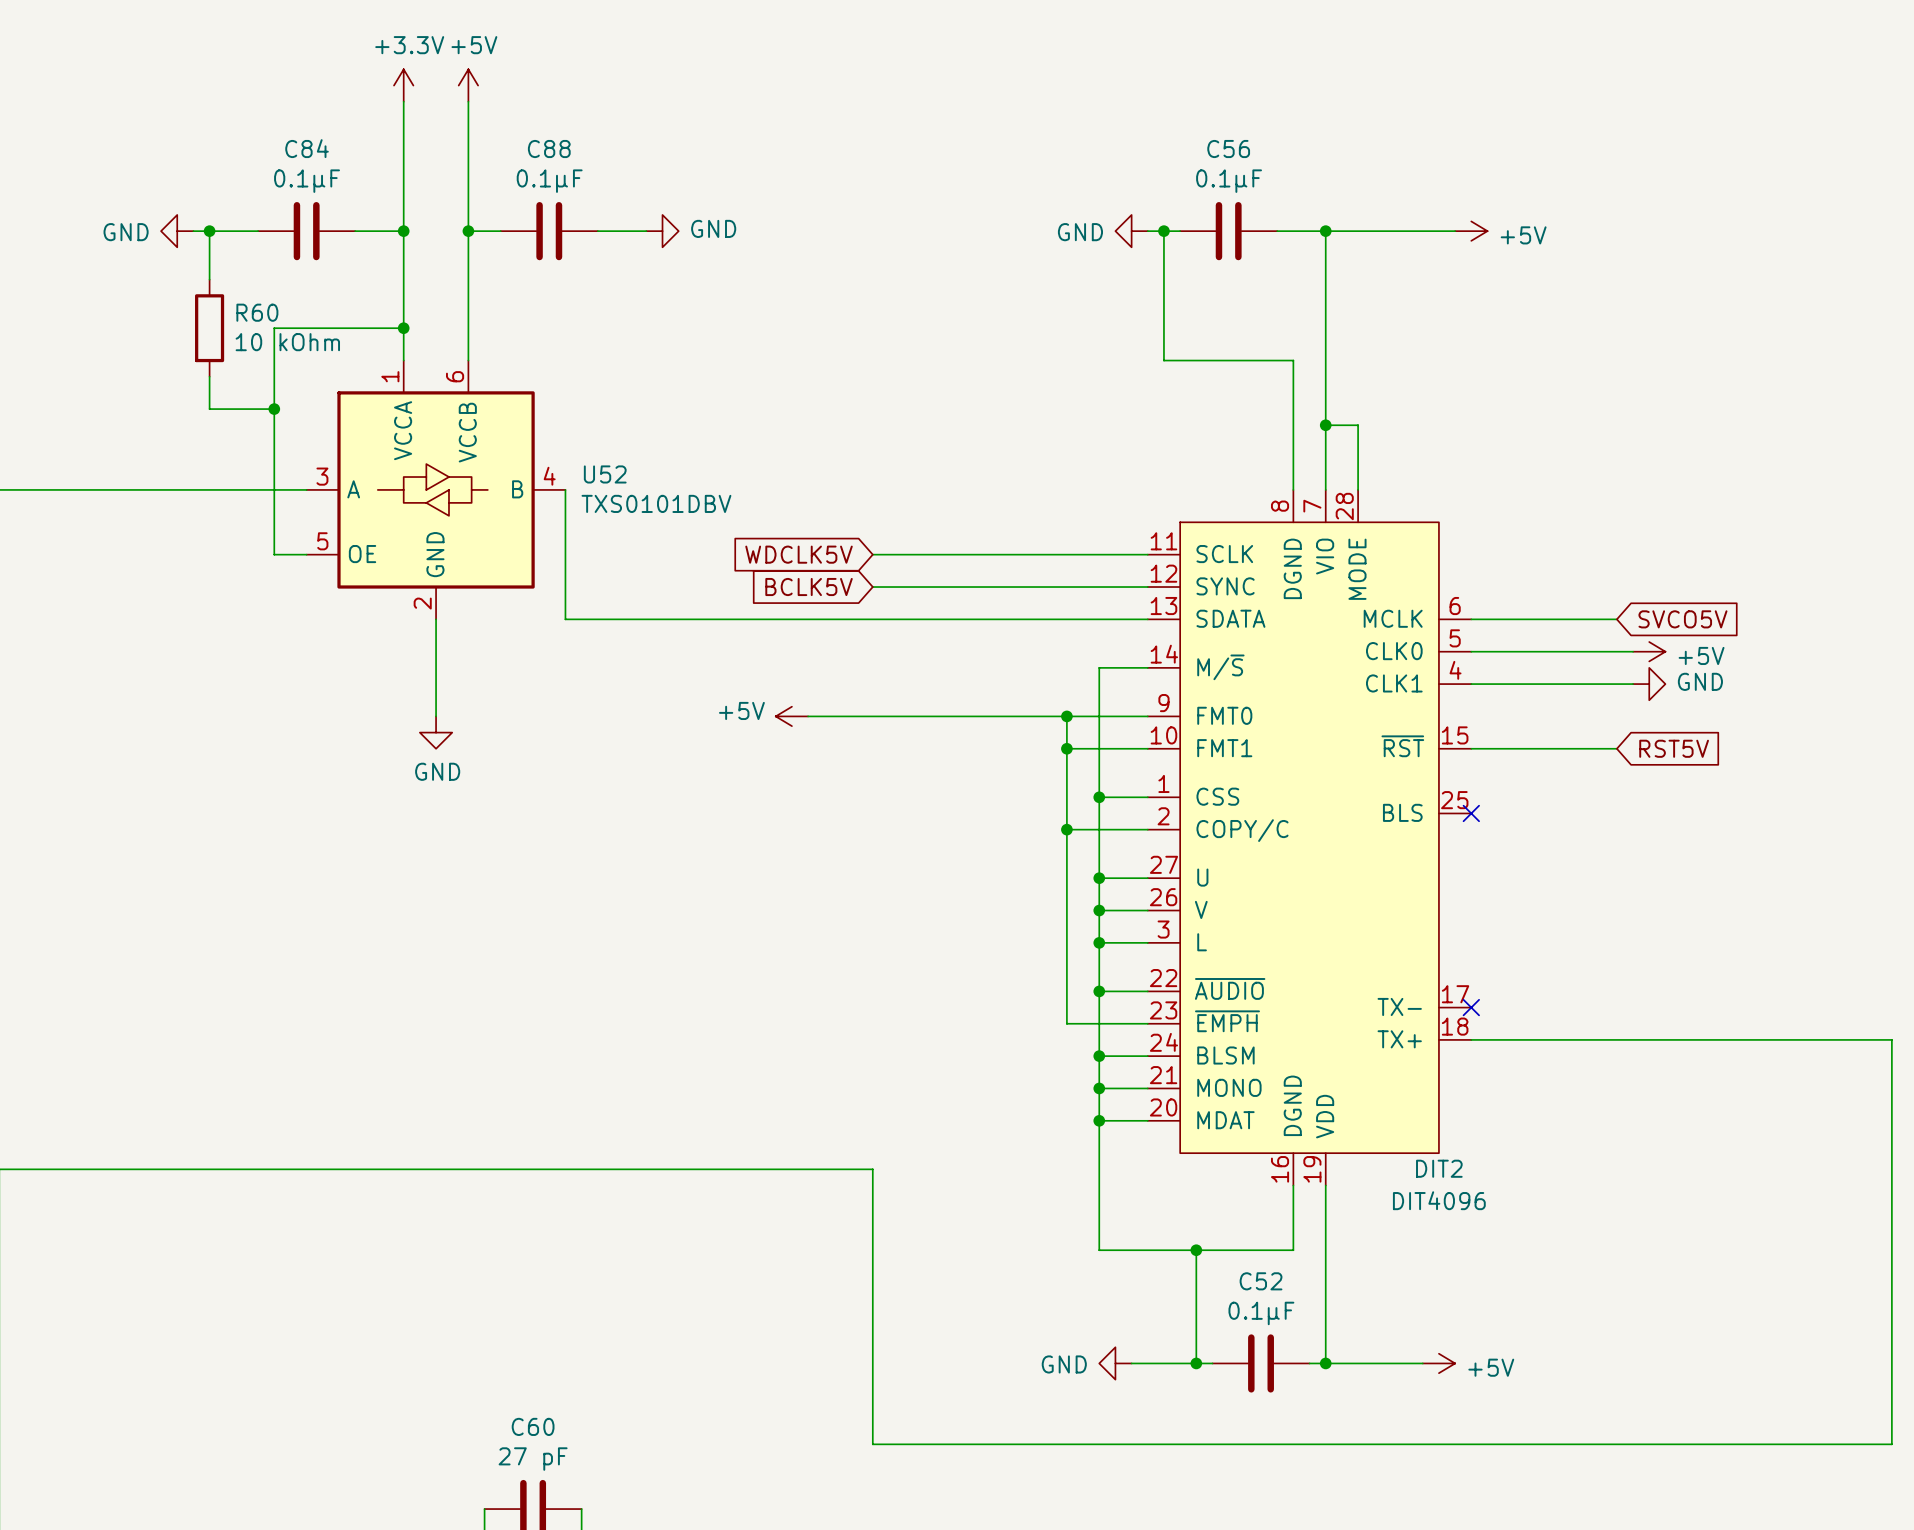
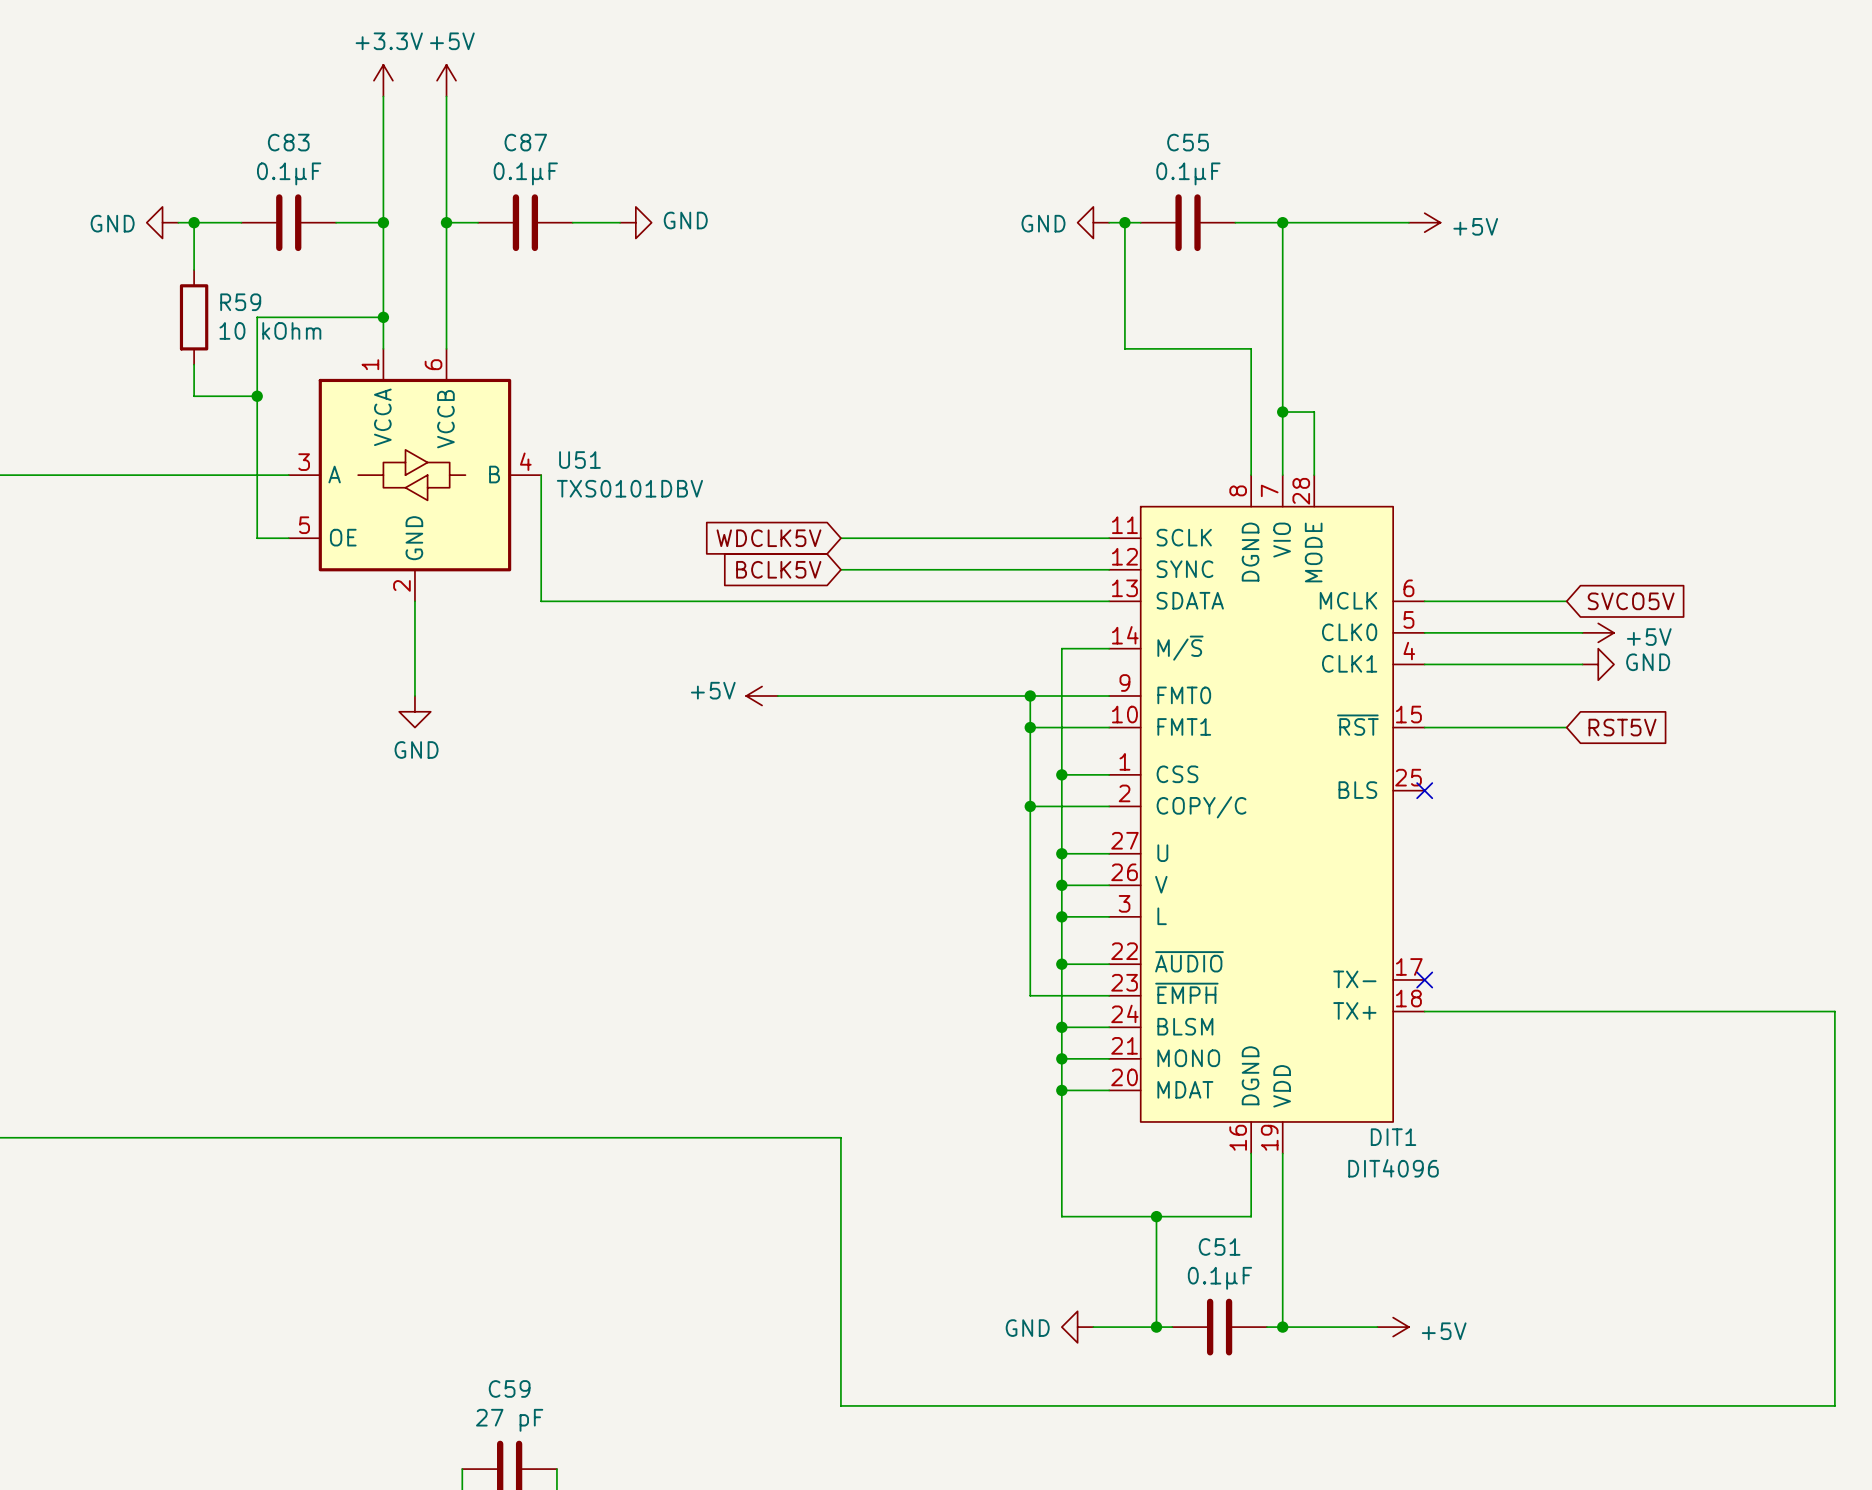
C84 name: C84 (307, 148) -> C83 (288, 142)
C88 name: C88 (549, 149) -> C87 (525, 142)
C56 name: C56 (1228, 149) -> C55 (1188, 142)
R60 name: R60 (257, 312) -> R59 (240, 302)
U52 name: U52 (605, 474) -> U51 (579, 460)
DIT2 name: DIT2 (1439, 1168) -> DIT1 (1393, 1137)
C52 name: C52 (1261, 1281) -> C51 (1219, 1246)
C60 name: C60 (533, 1426) -> C59 (509, 1388)

